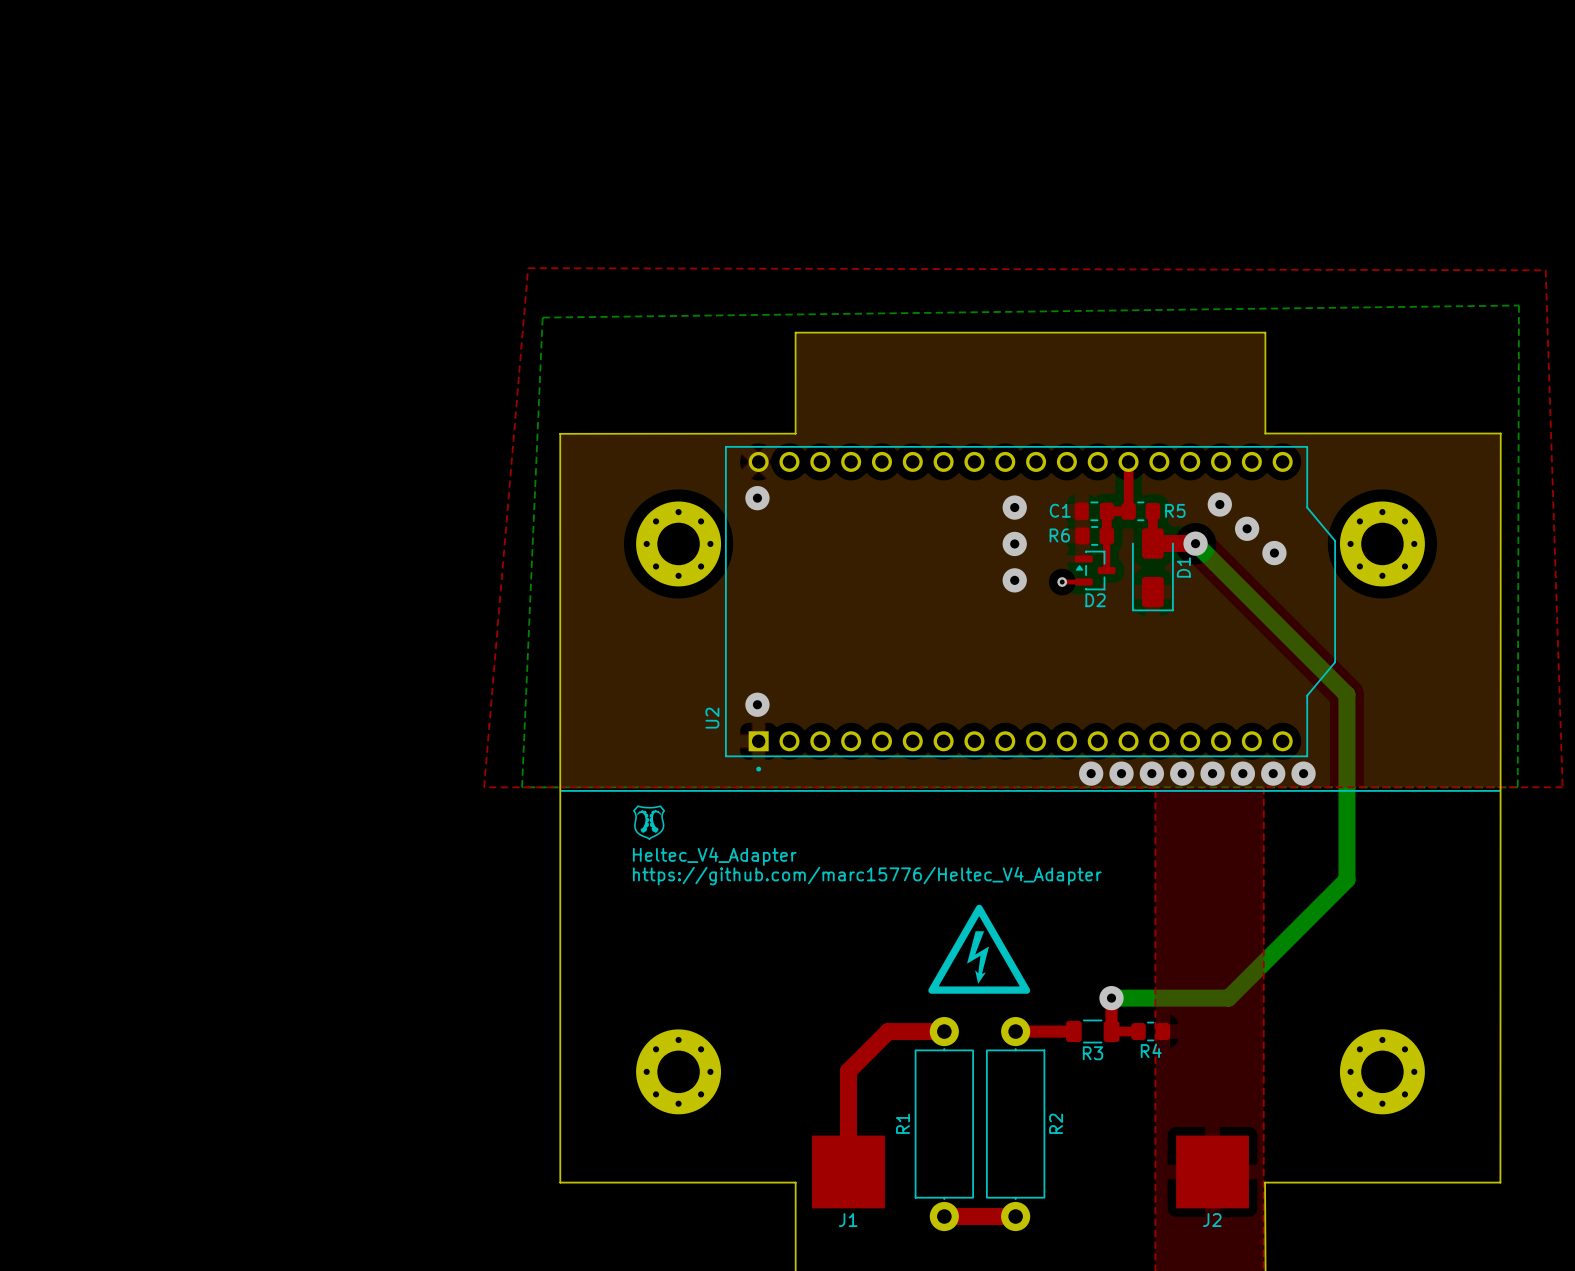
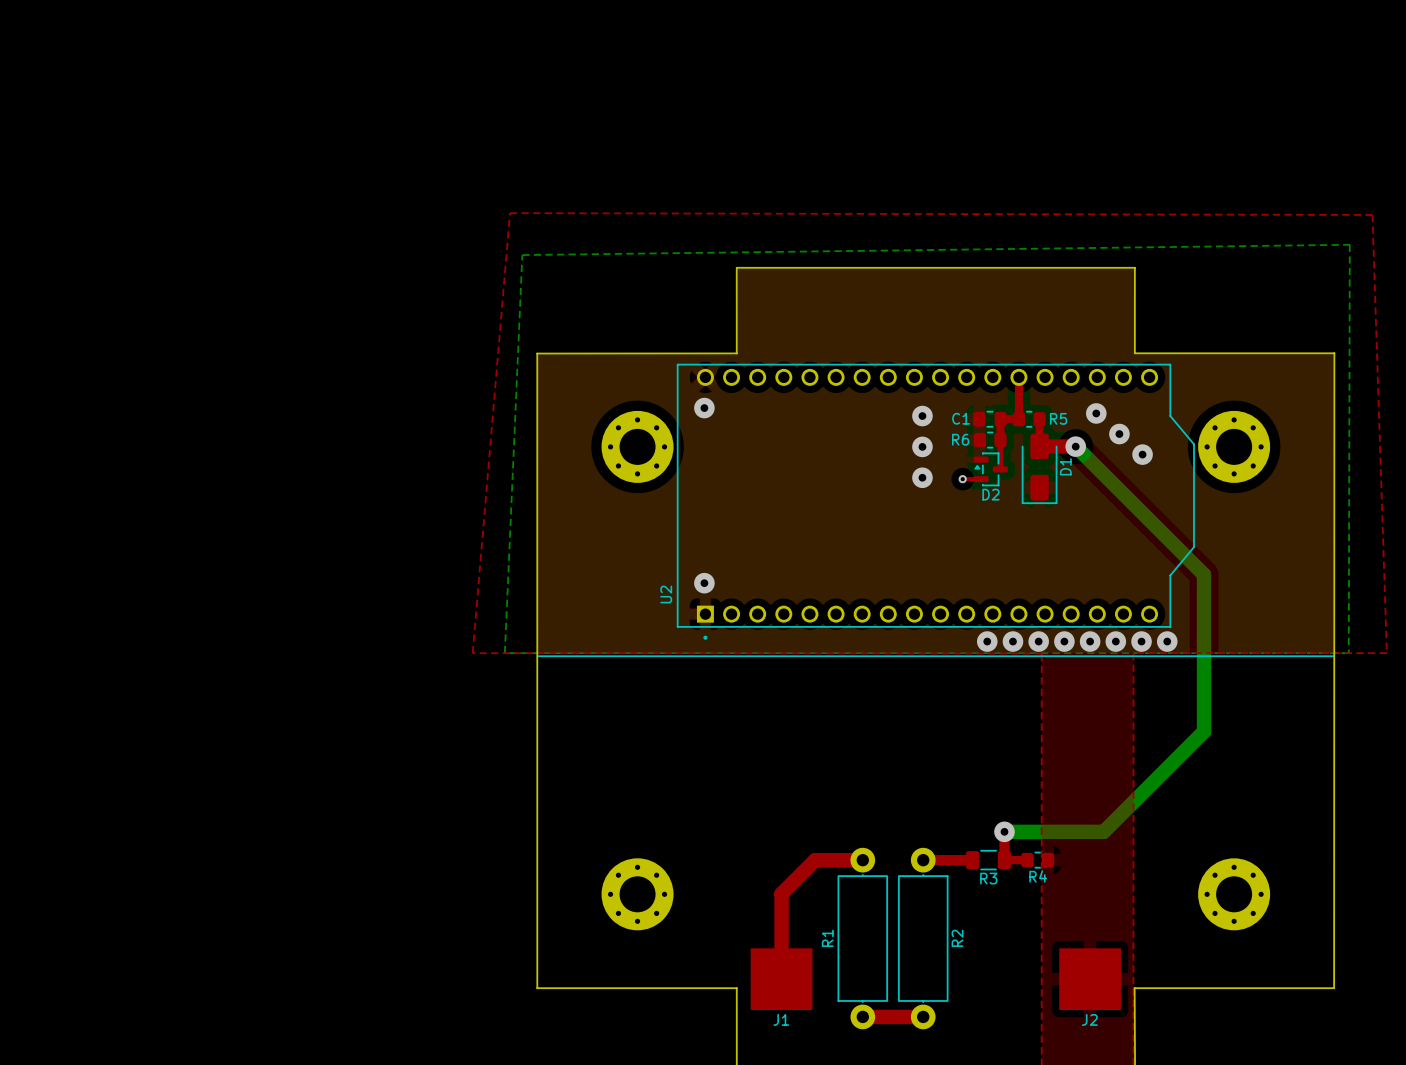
drawing: [633, 805, 666, 841] -> none
text: Heltec_V4_Adapter (714, 856) -> none
text: https://github.com/marc15776/Heltec_V4_Adapter (867, 876) -> none
drawing: [928, 904, 1031, 994] -> none

